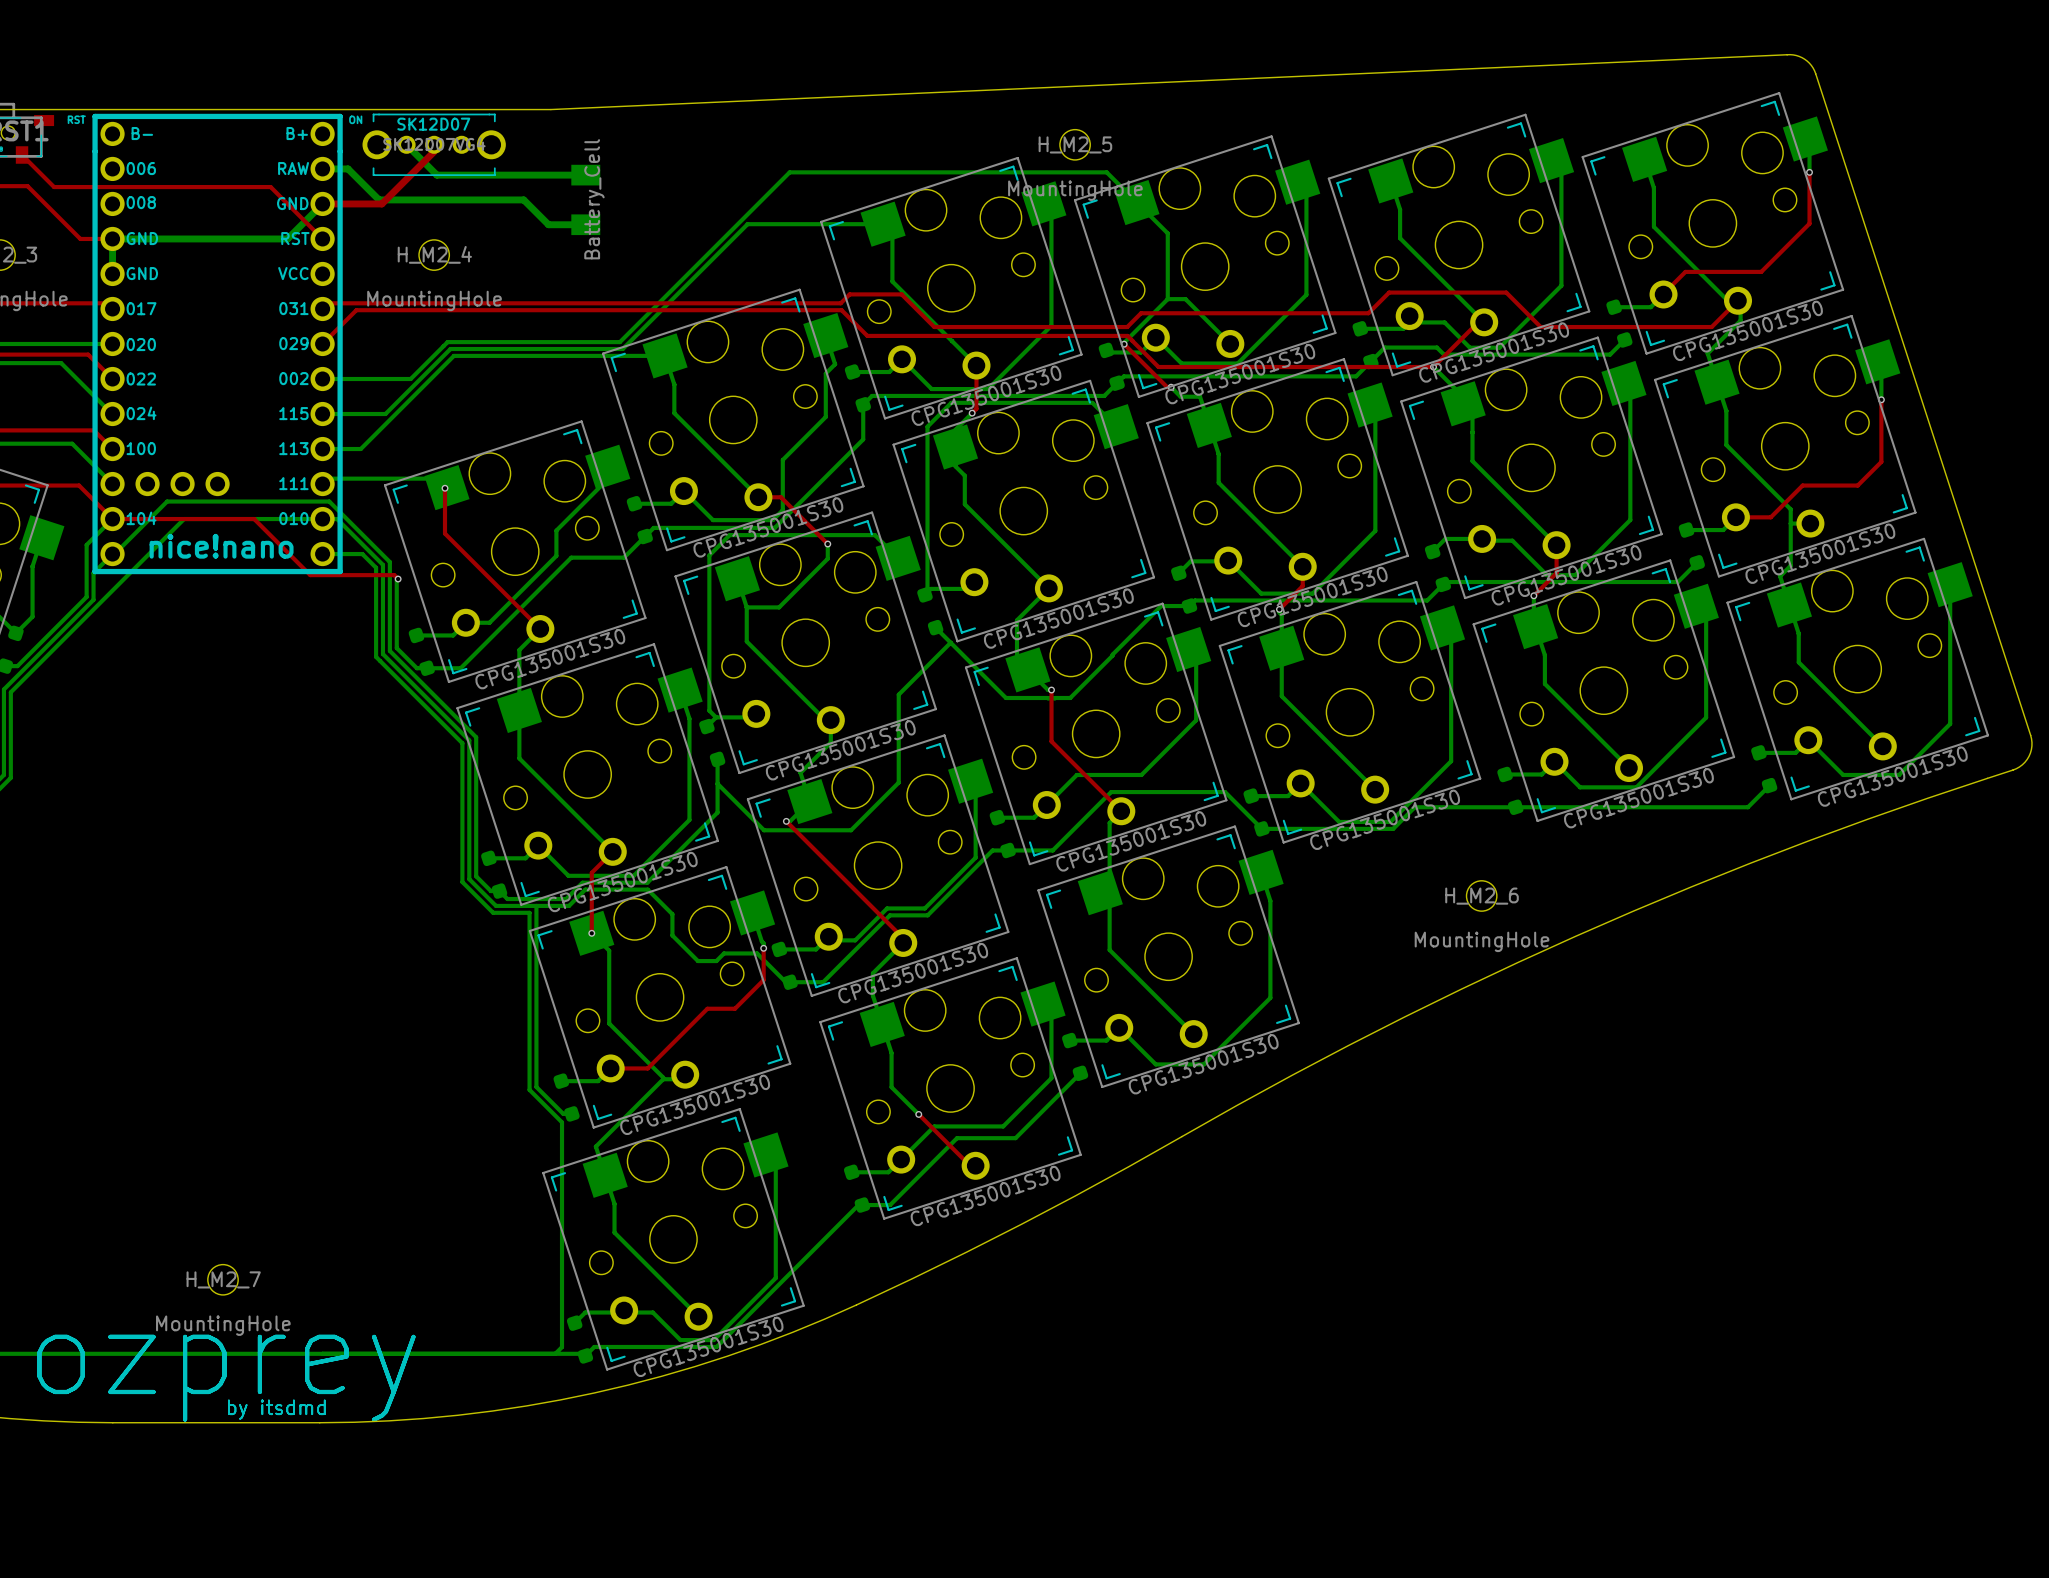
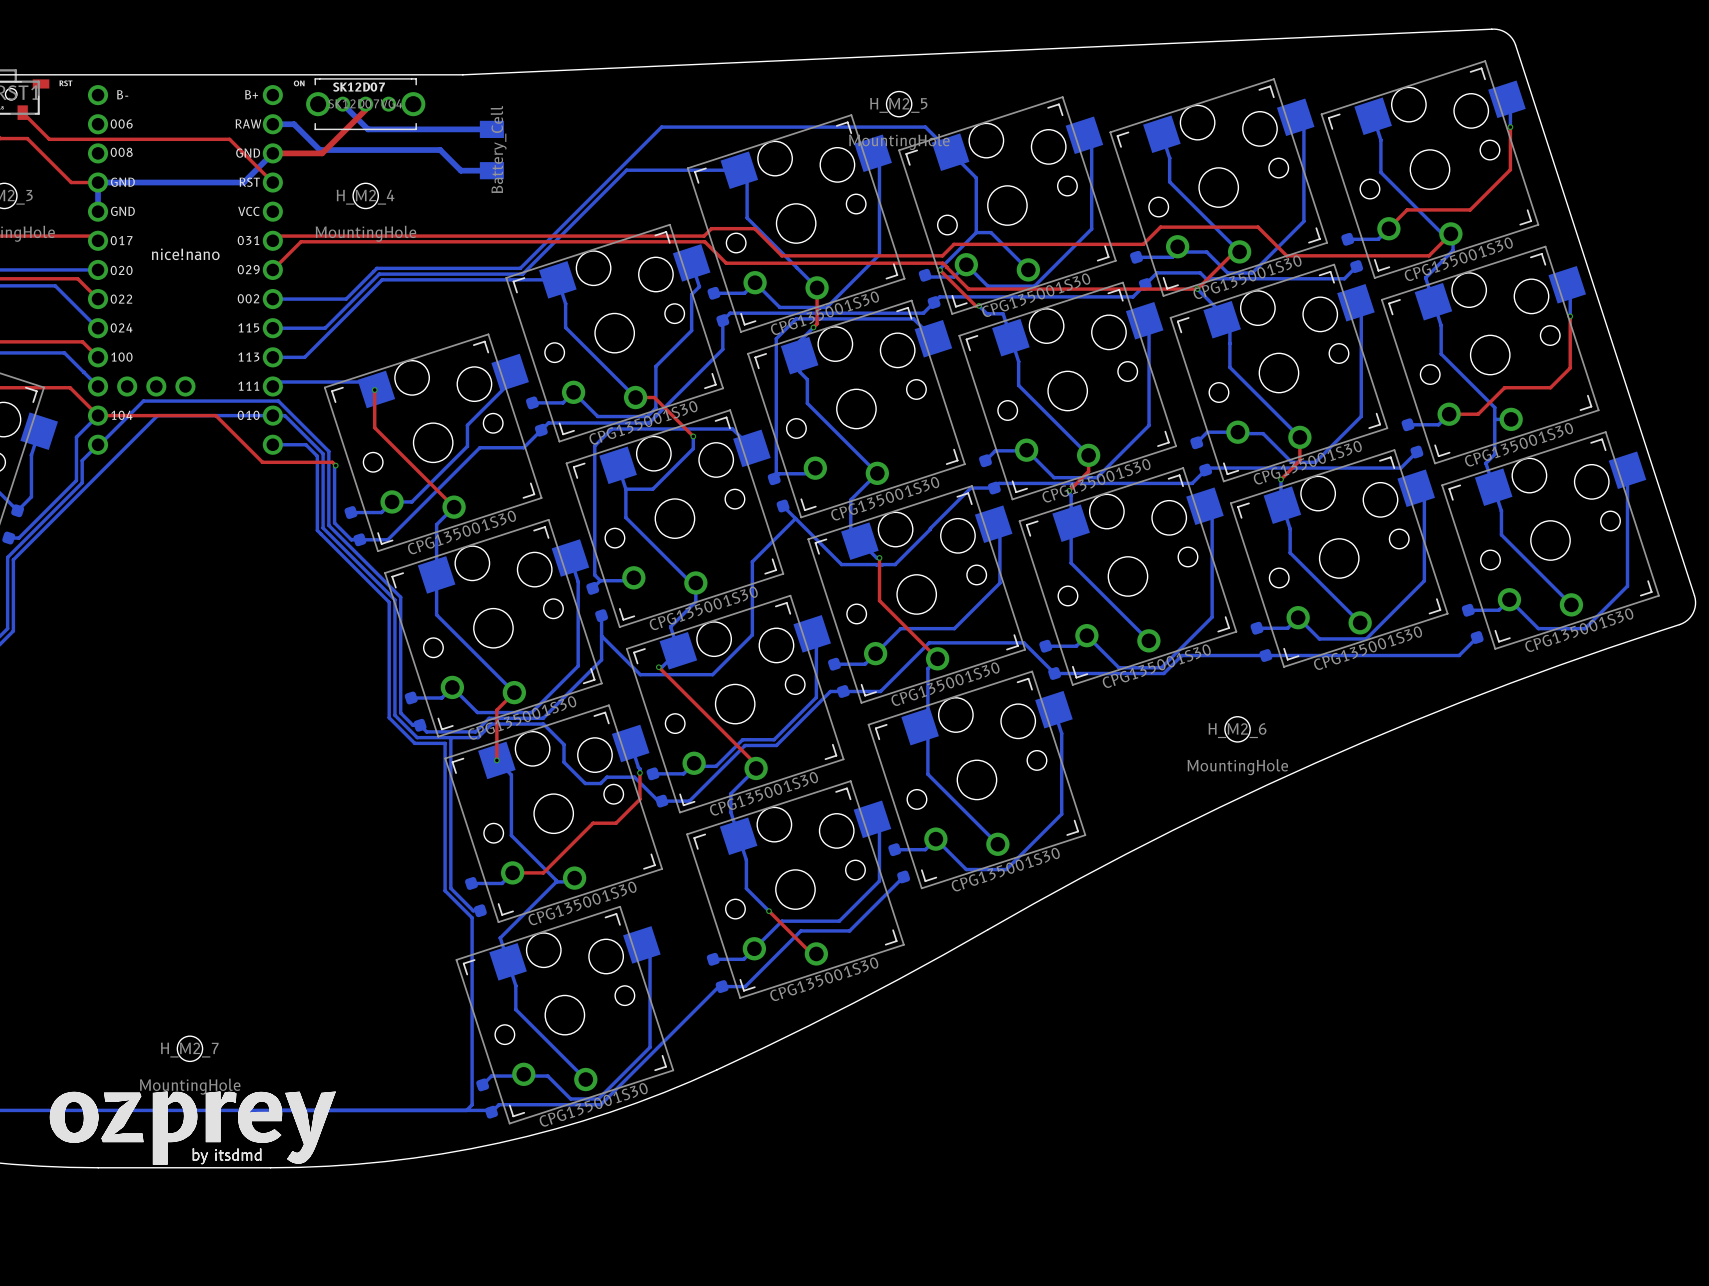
part footprint: [92, 113, 343, 575] -> [87, 85, 283, 455]

